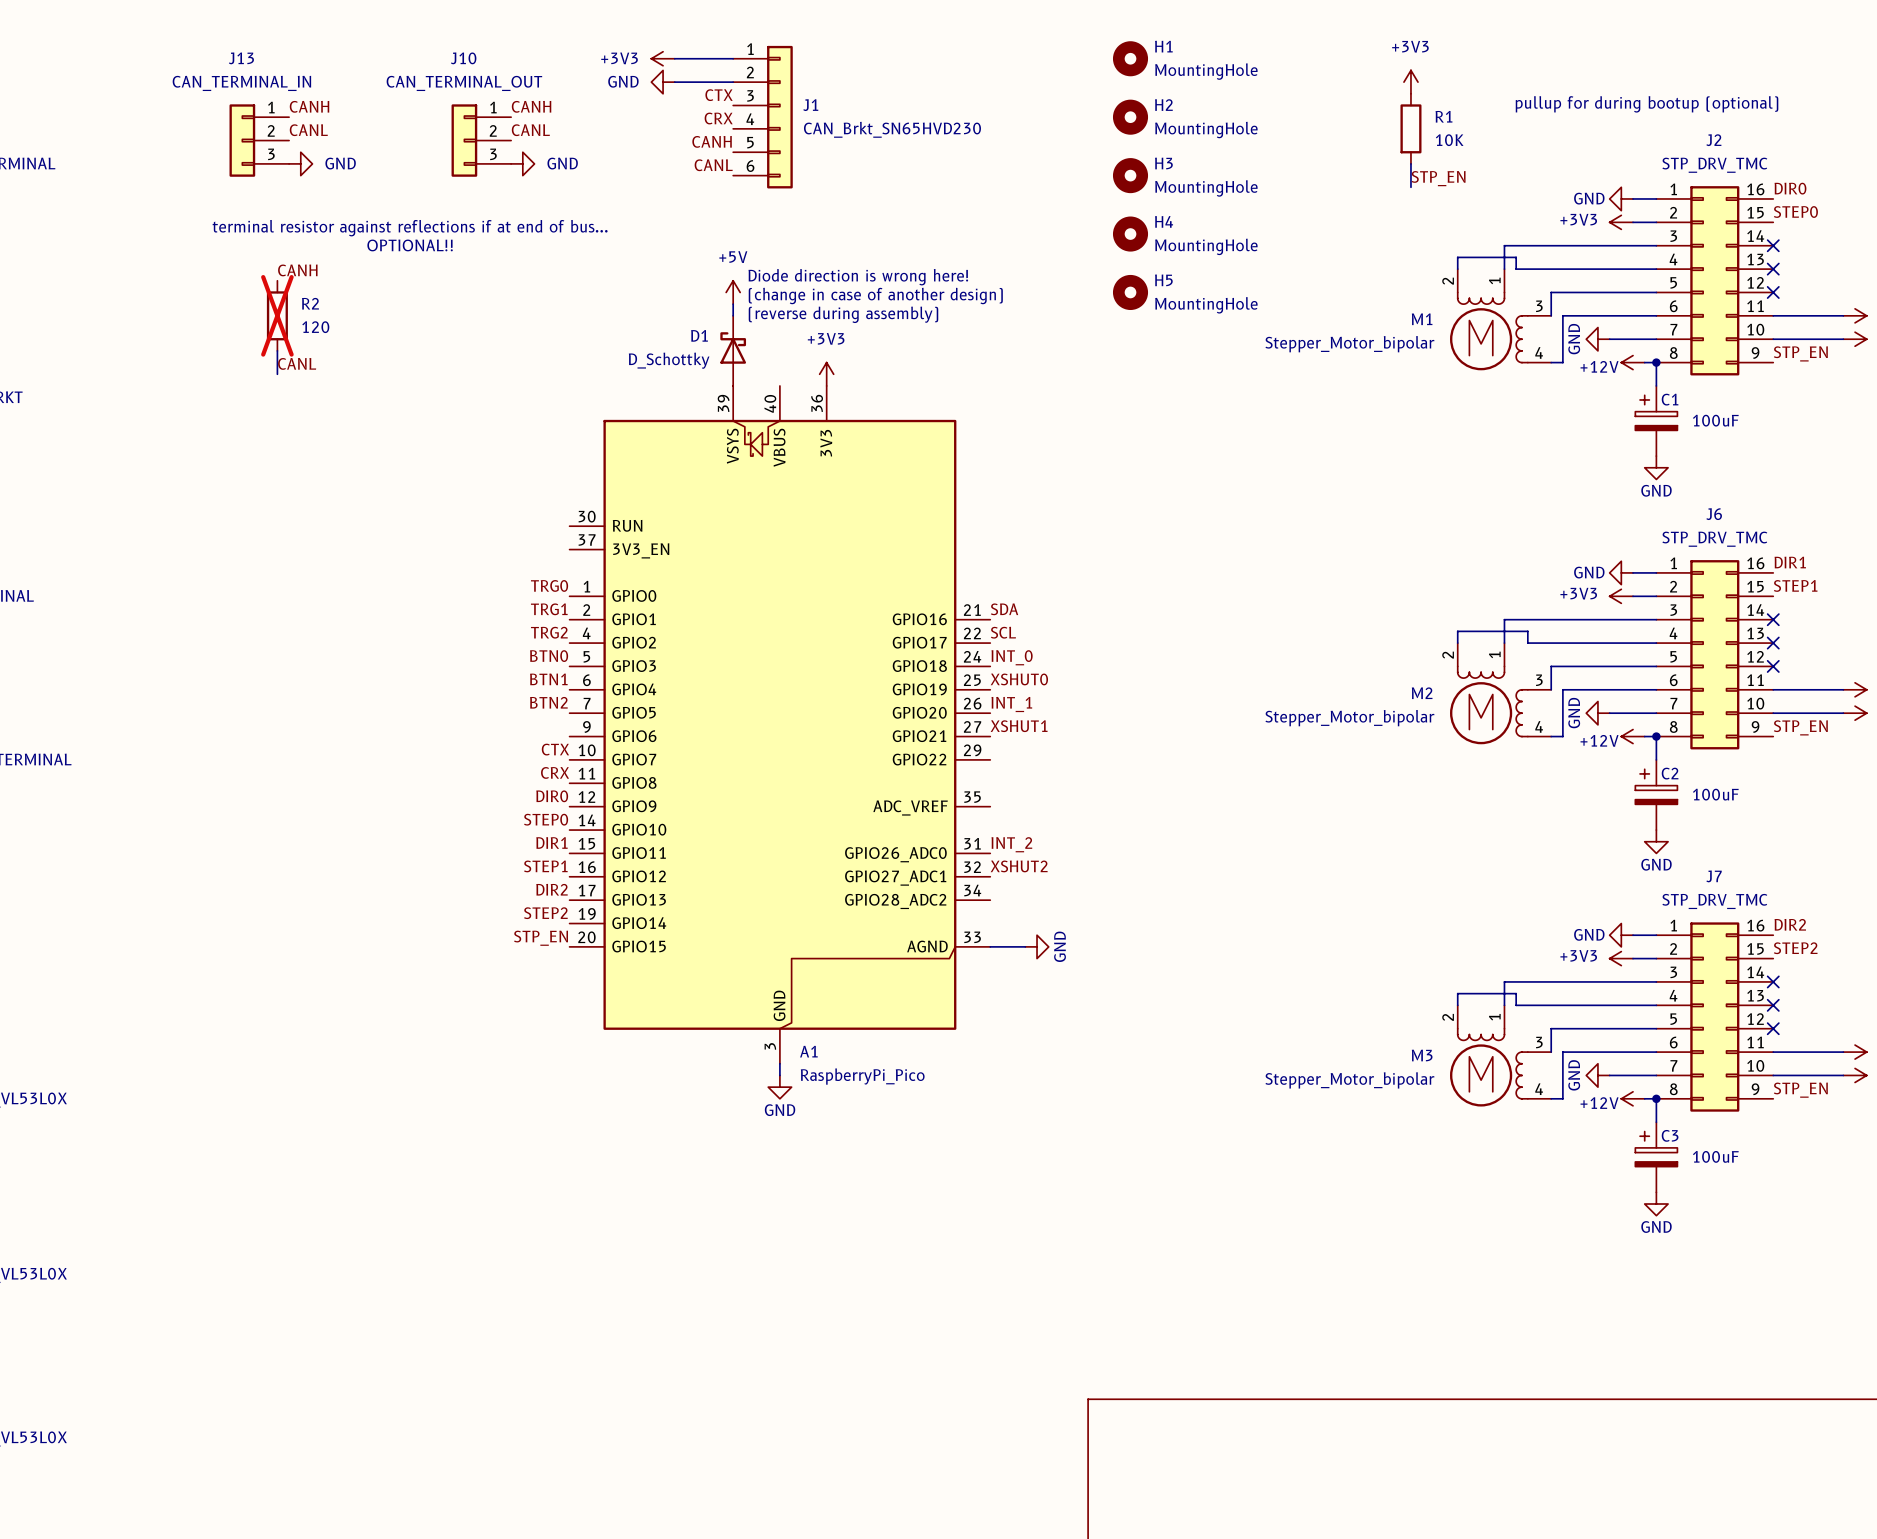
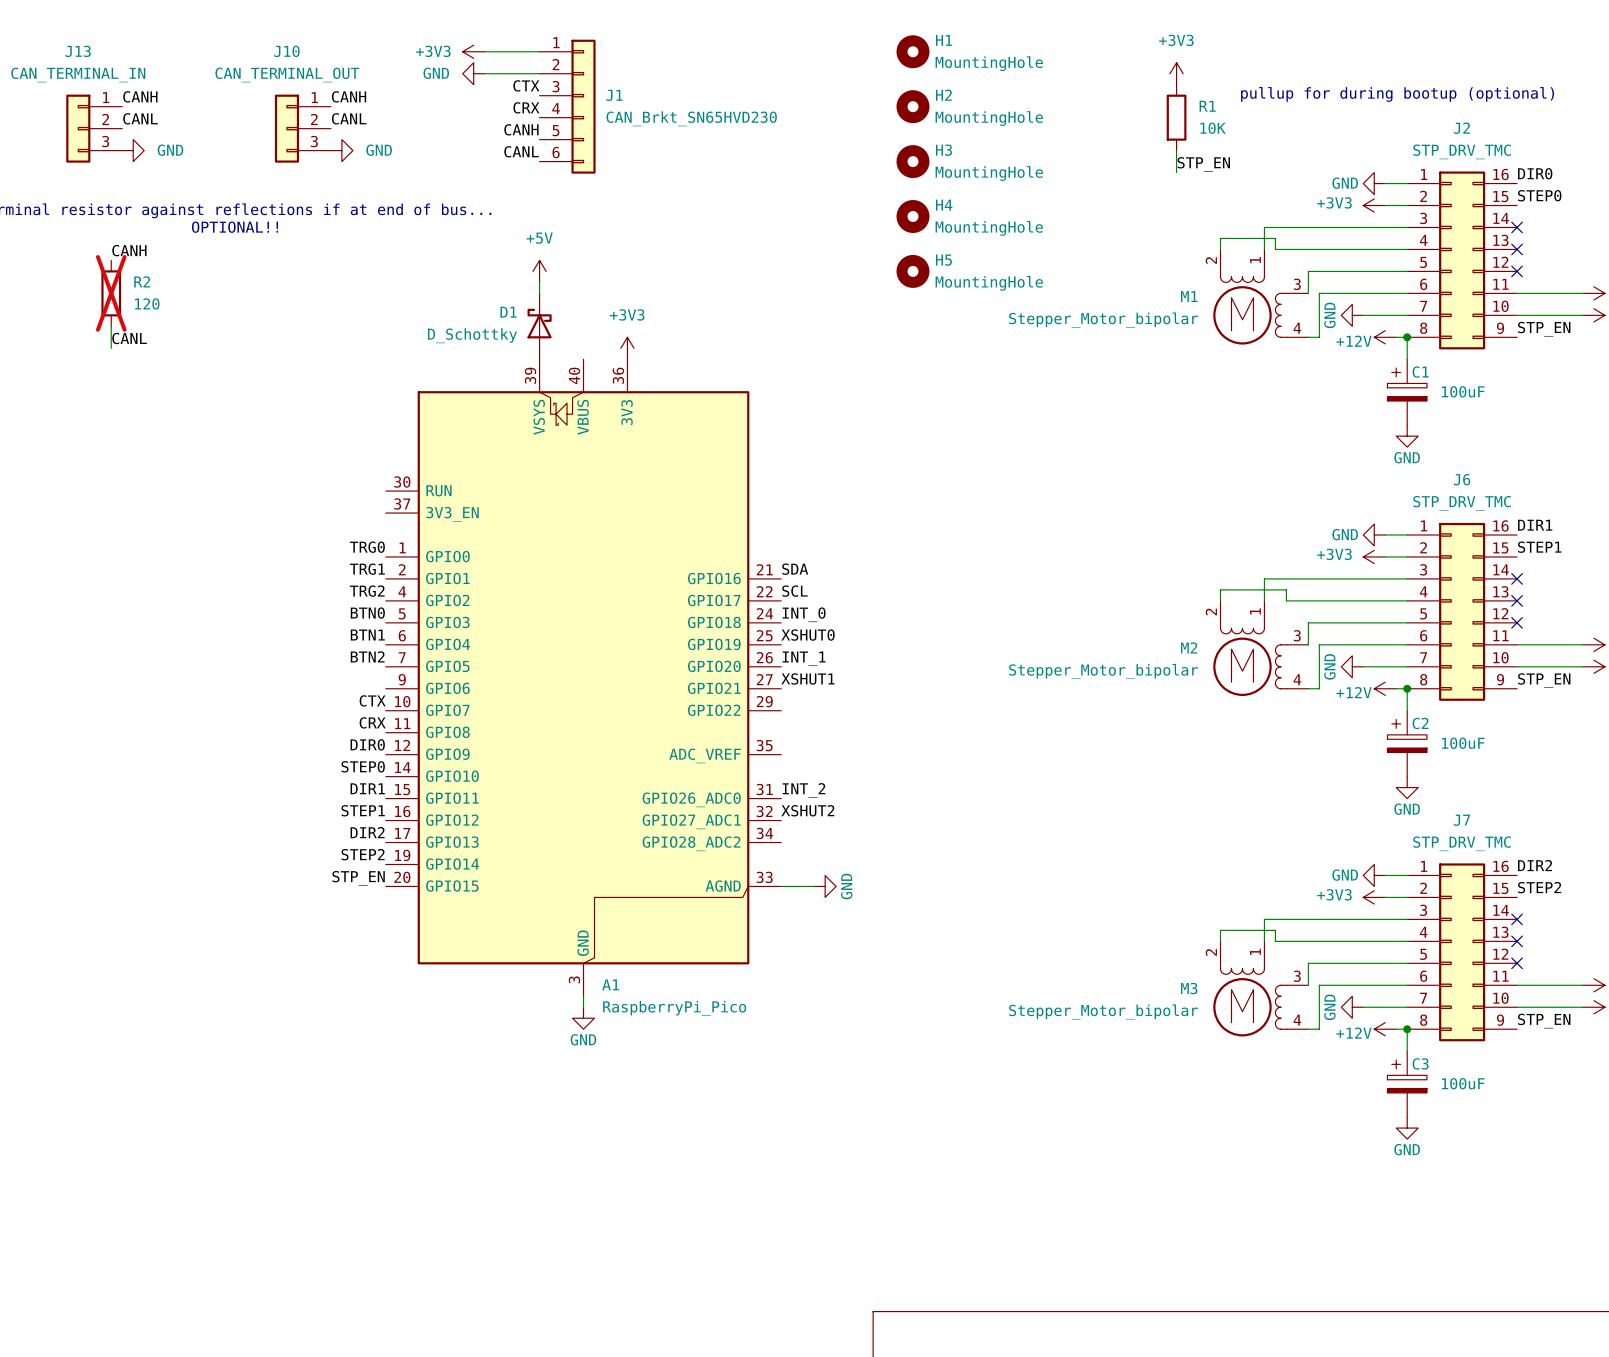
text: Diode direction is wrong here! (858, 277) -> none
text: (change in case of another design) (875, 296) -> none
text: (reverse during assembly) (843, 314) -> none

